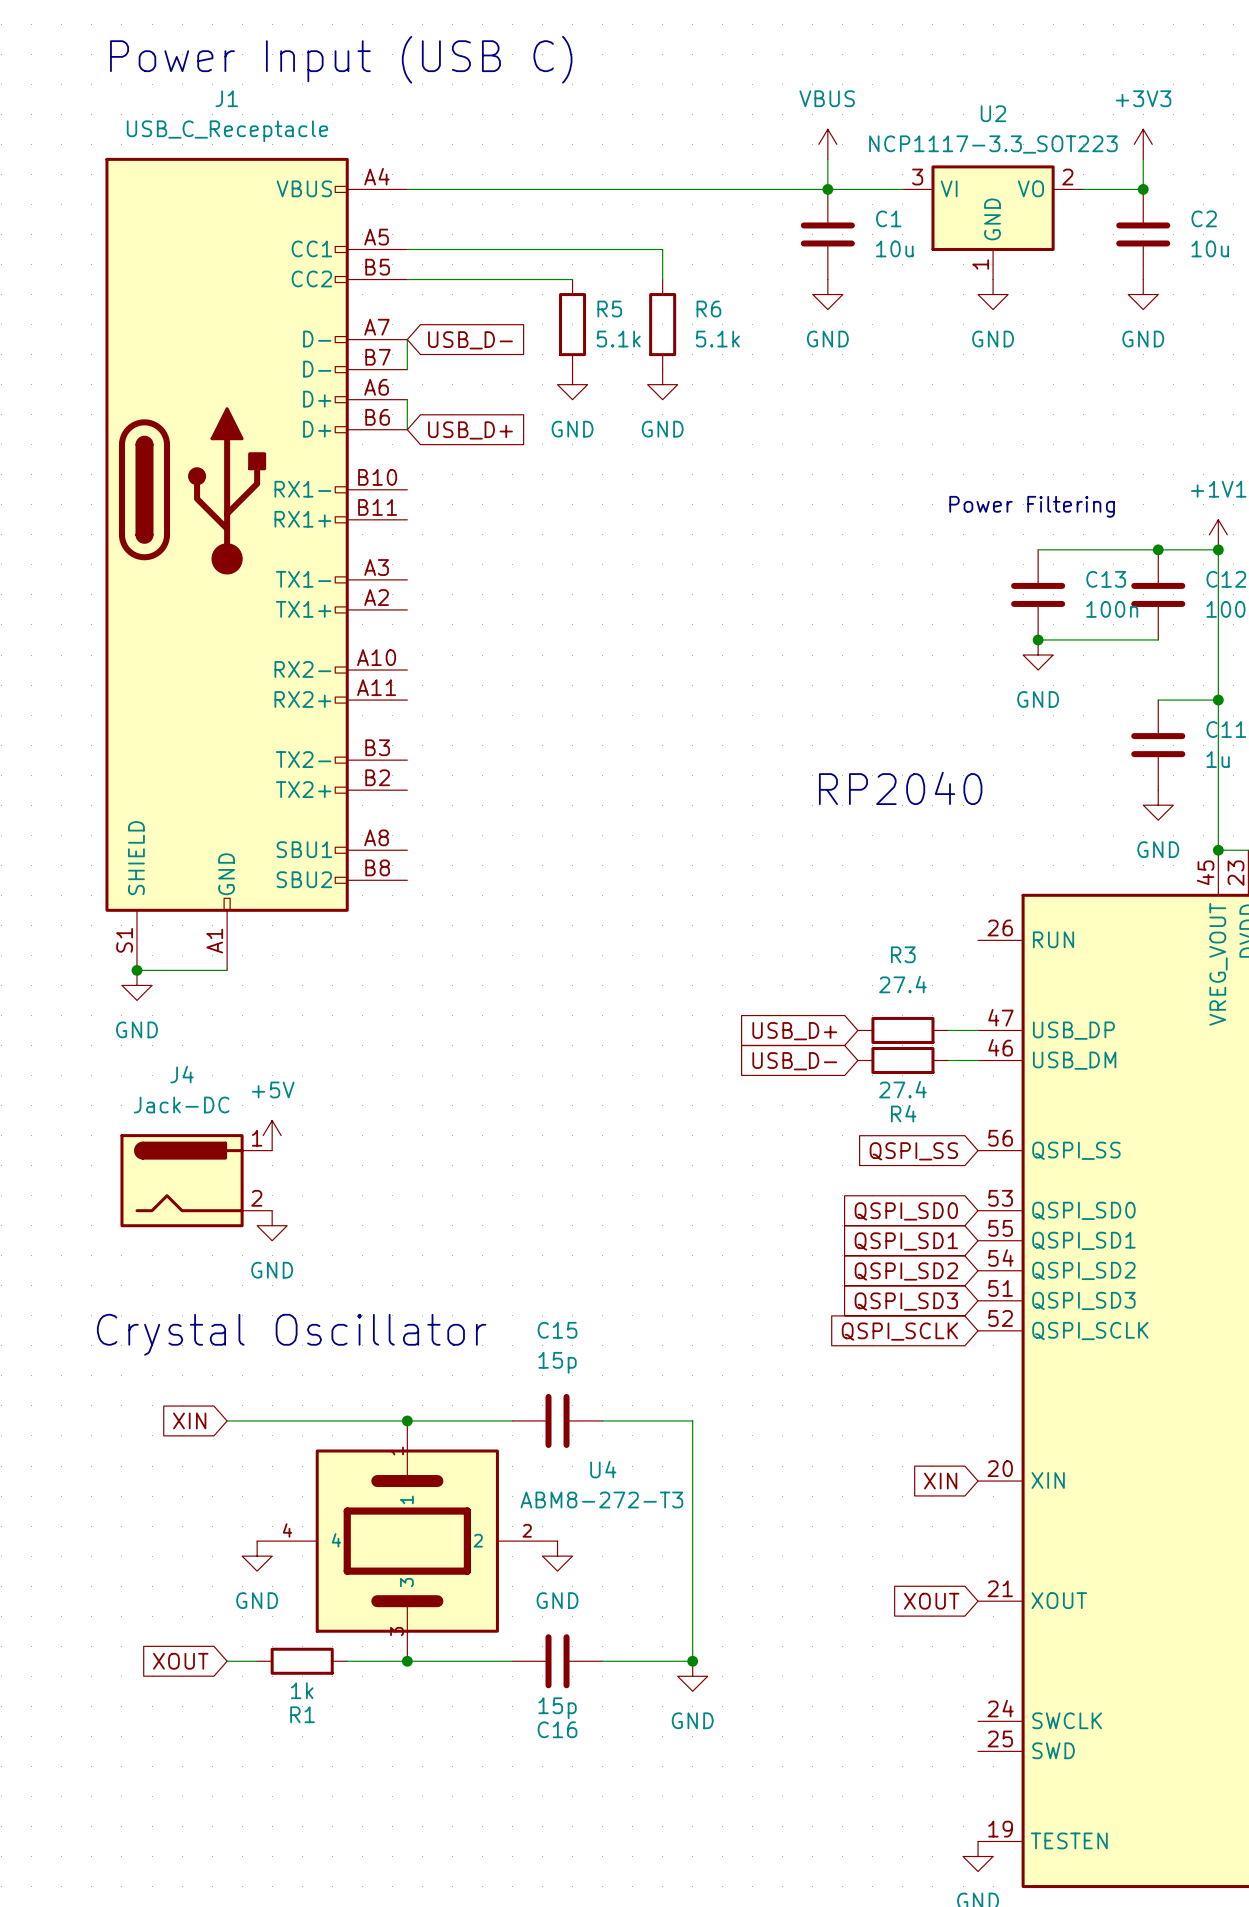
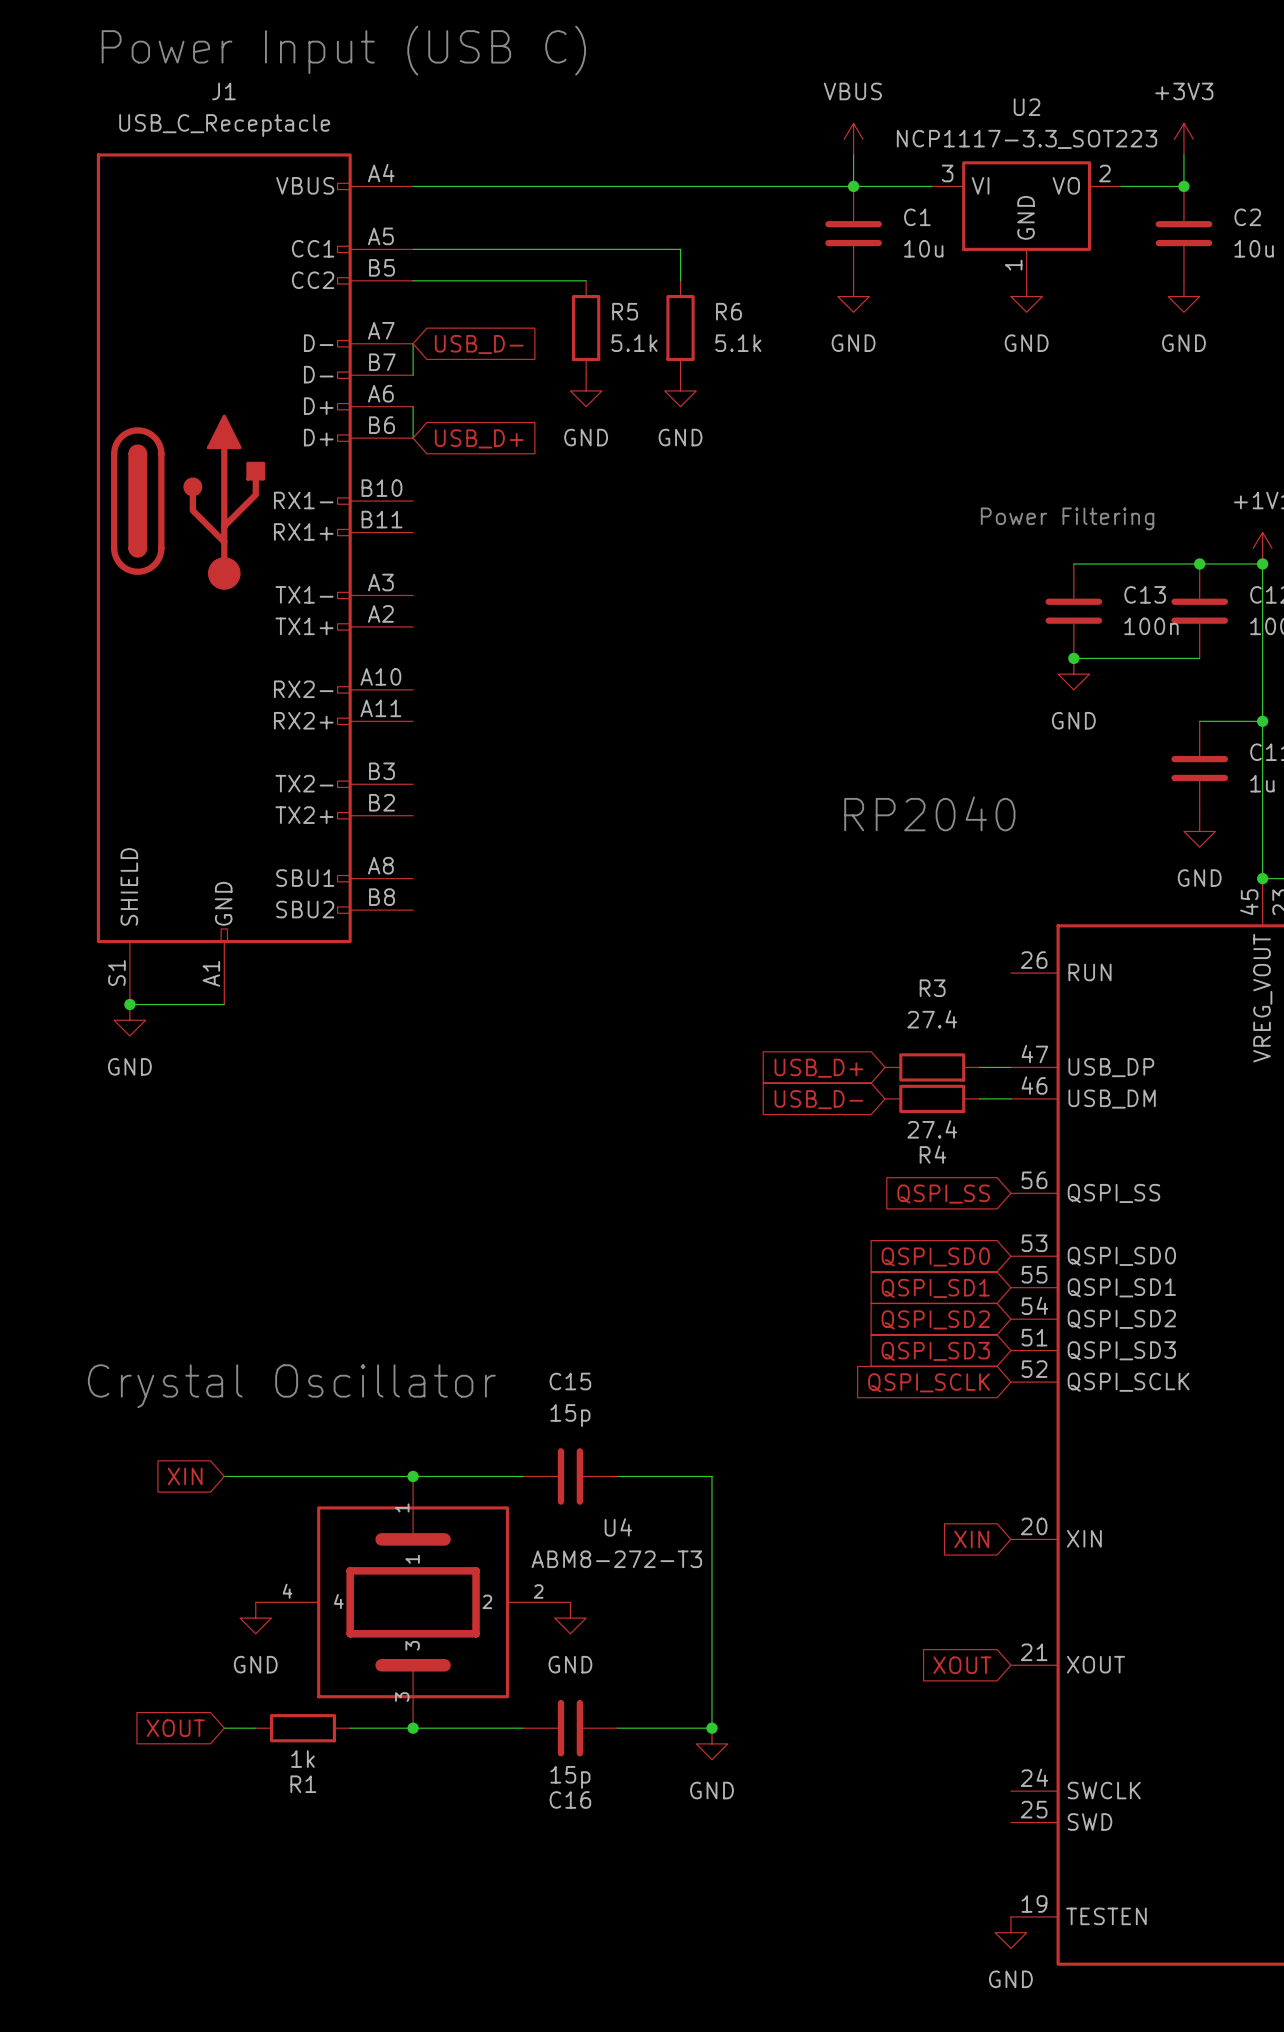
power symbol: +5V (272, 1135) -> none
J4: Jack-DC (196, 1180) -> none
power symbol: GND (272, 1225) -> none

